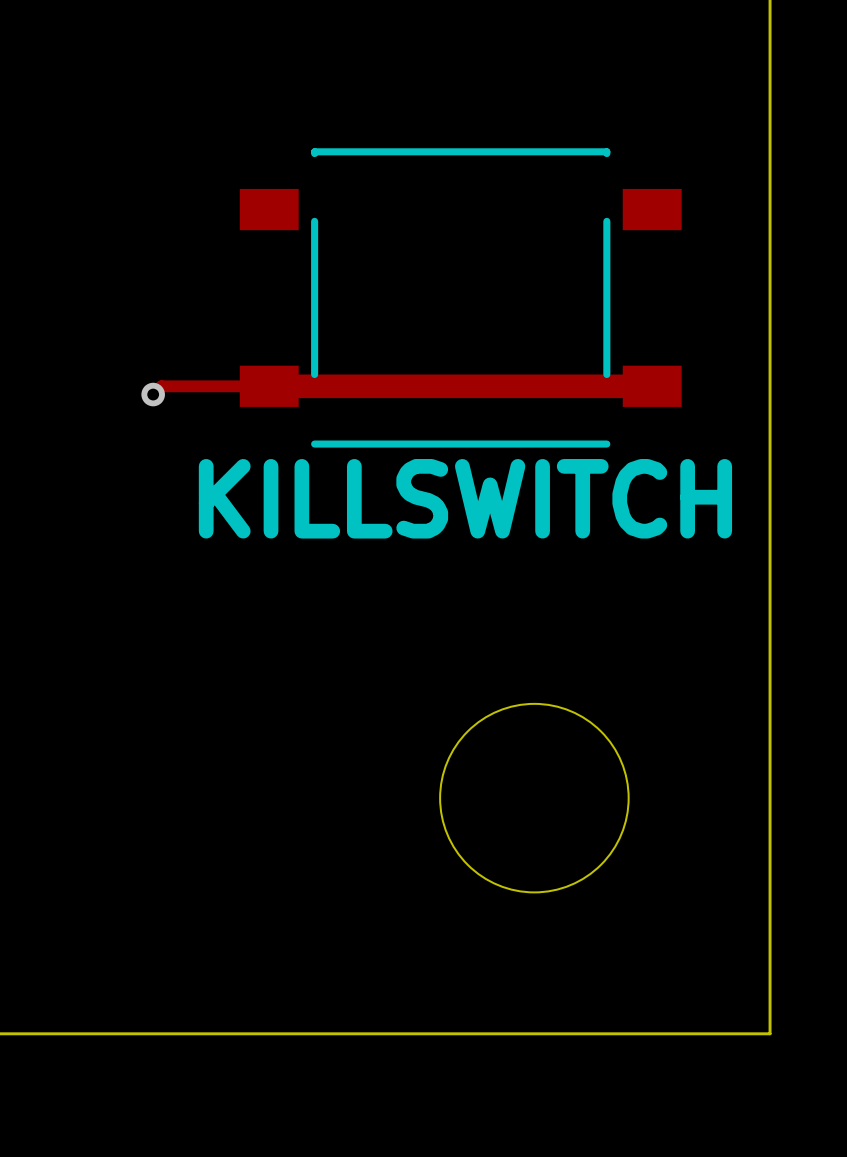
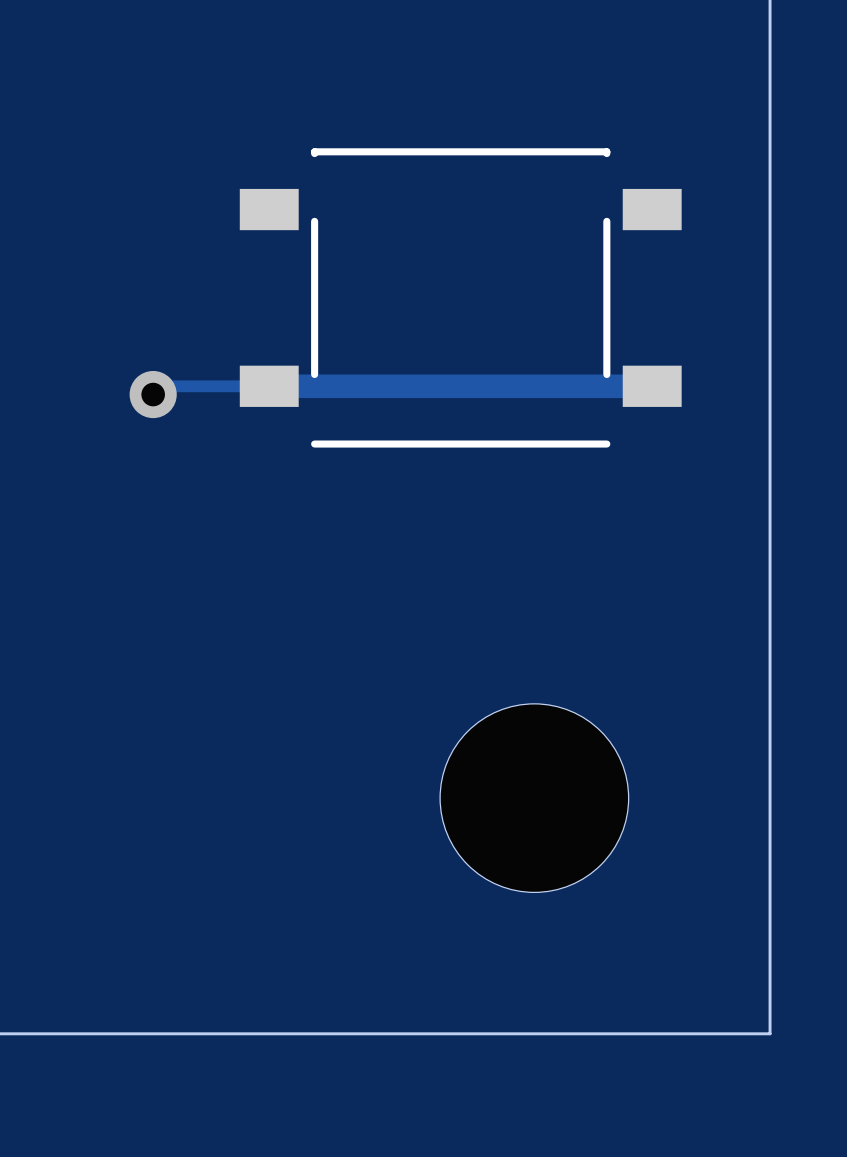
via size: [141, 382, 165, 407] -> [129, 370, 177, 419]
text: KILLSWITCH (465, 498) -> none

